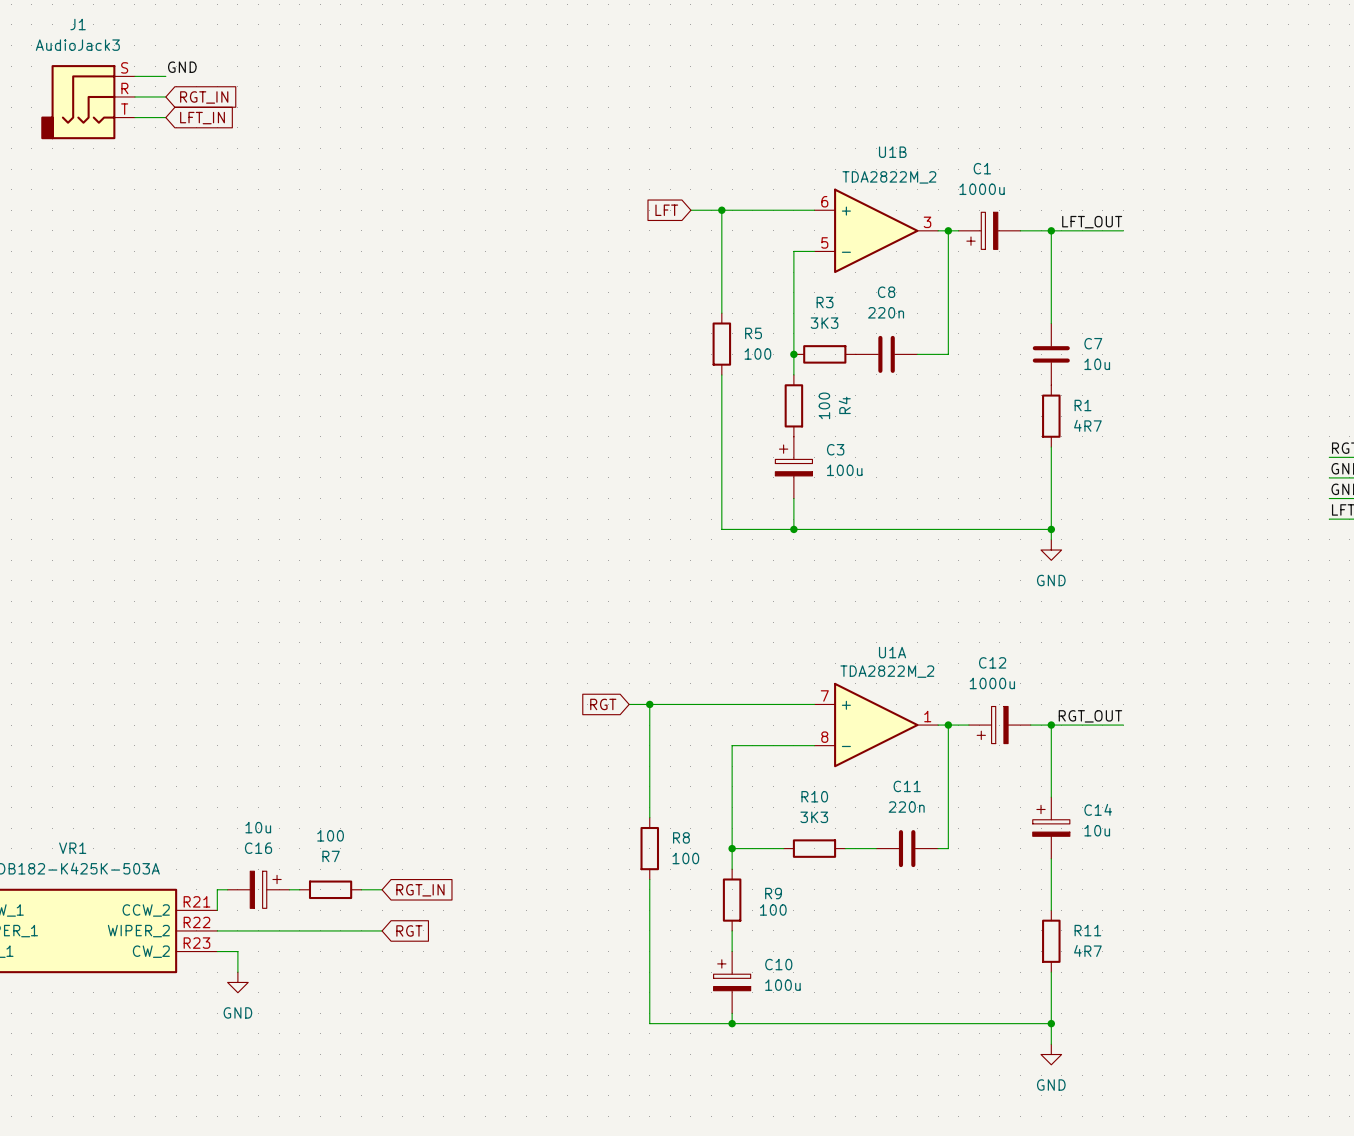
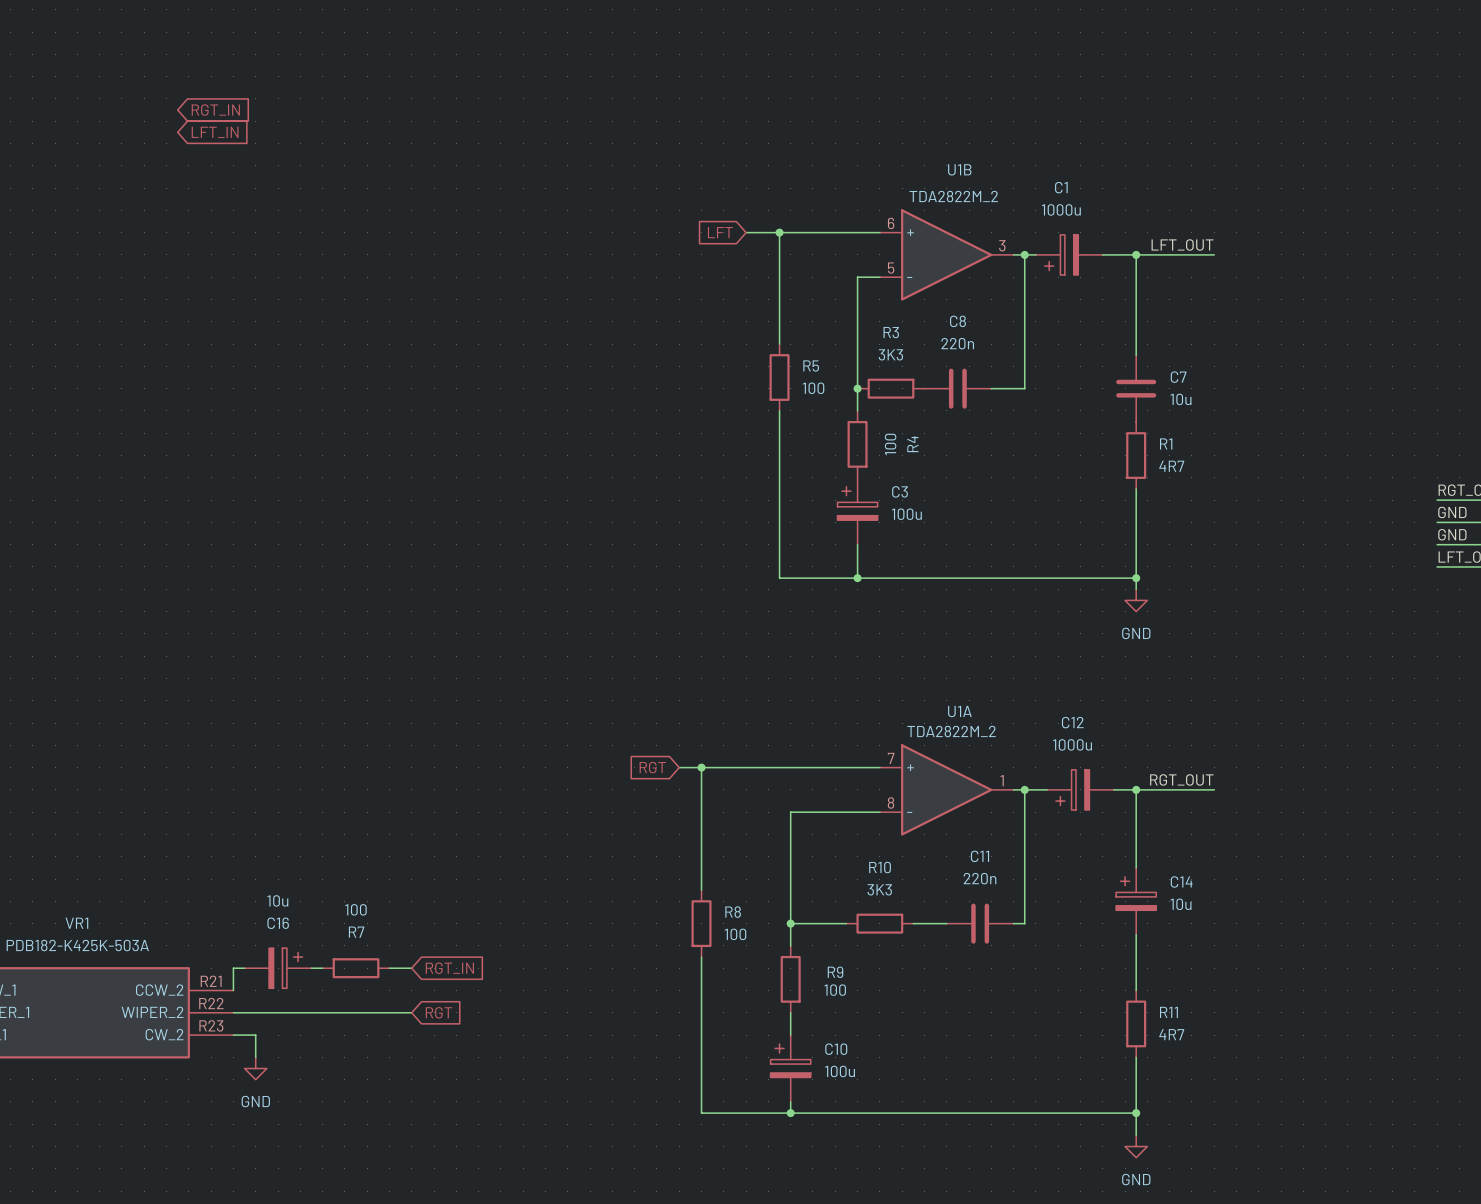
label: GND (182, 67) -> none
wire: (134, 76) (165, 76) -> none
wire: (134, 96) (165, 96) -> none
J1: AudioJack3 (88, 102) -> none
wire: (134, 117) (165, 117) -> none

